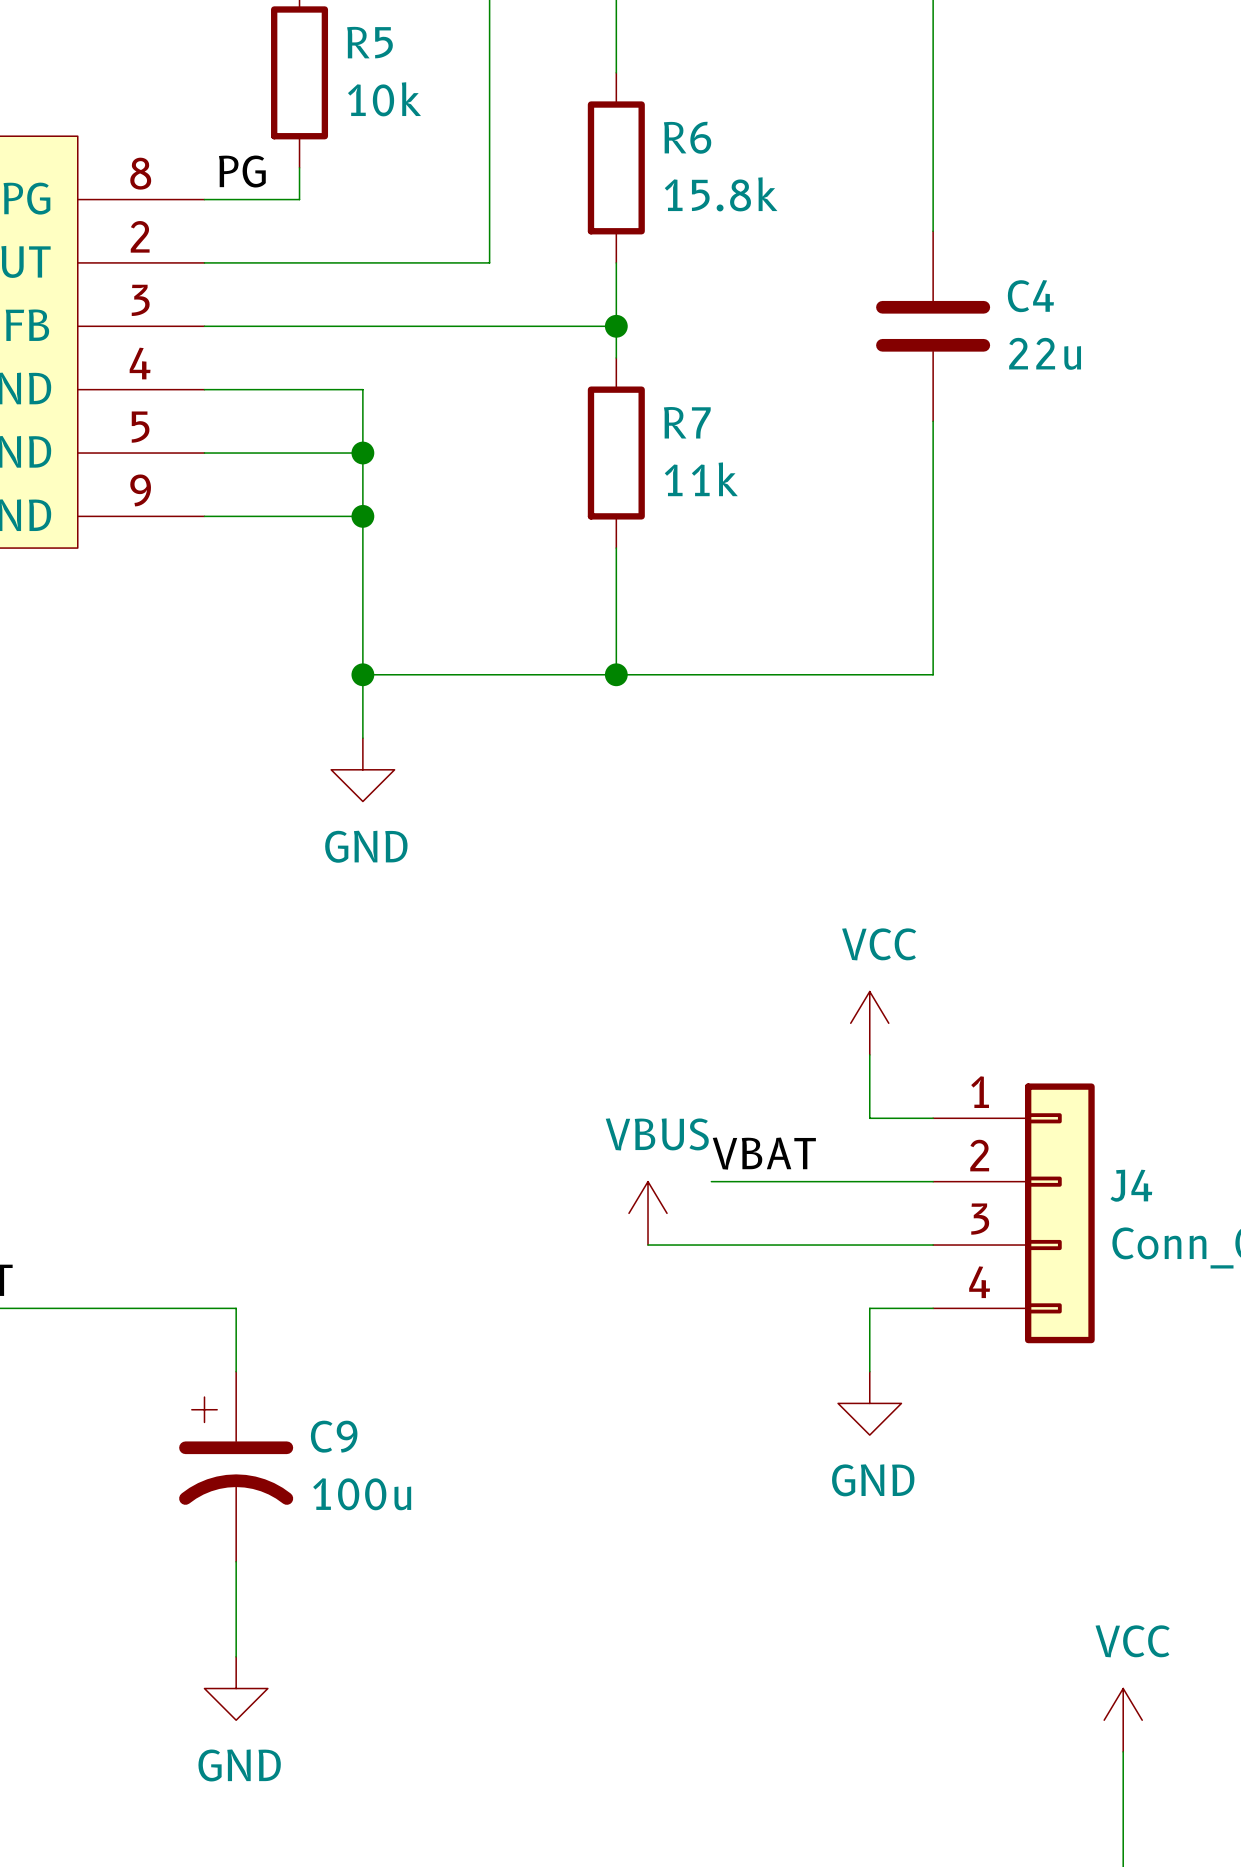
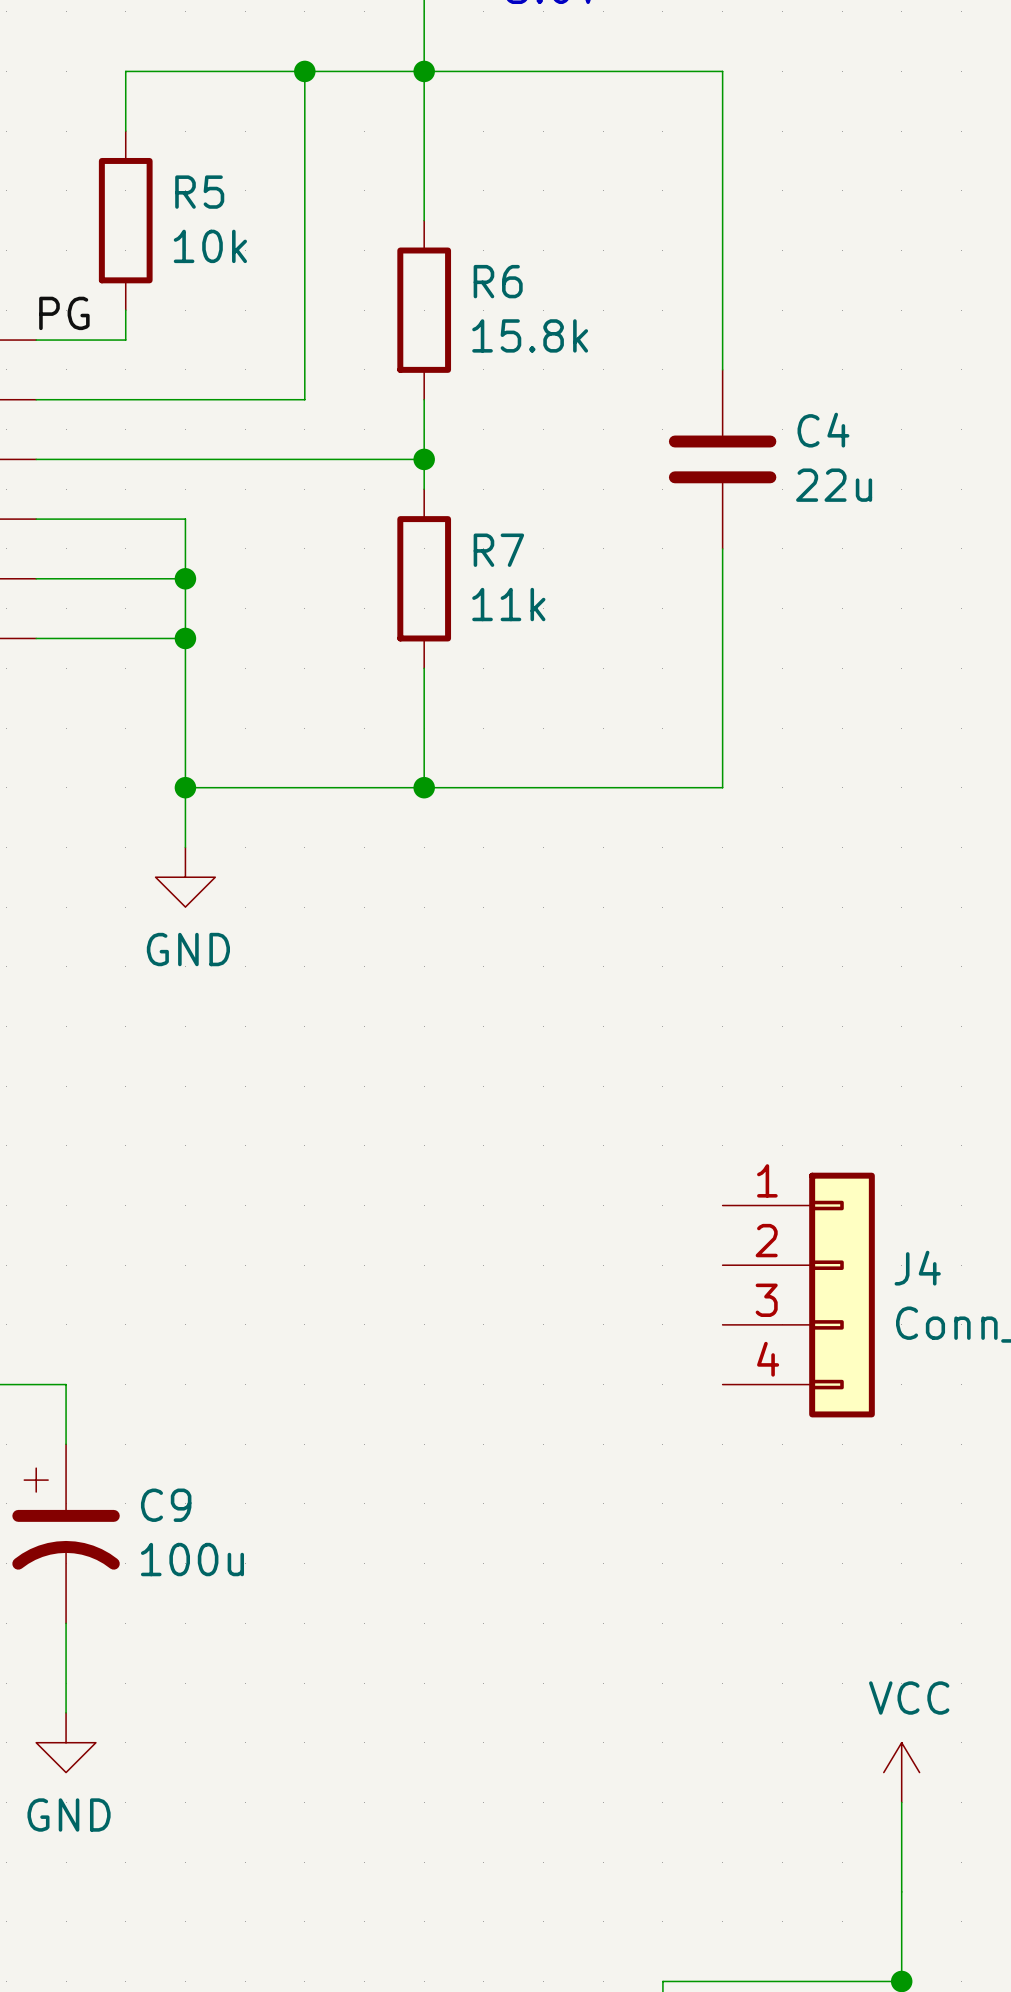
power symbol: VCC (869, 1023) -> none
wire: (869, 1054) (869, 1118) (933, 1118) -> none
label: VBAT (764, 1153) -> none
wire: (711, 1181) (933, 1181) -> none
power symbol: VBUS (648, 1213) -> none
wire: (648, 1245) (933, 1245) -> none
wire: (933, 1308) (869, 1308) (869, 1371) -> none
power symbol: GND (869, 1403) -> none

